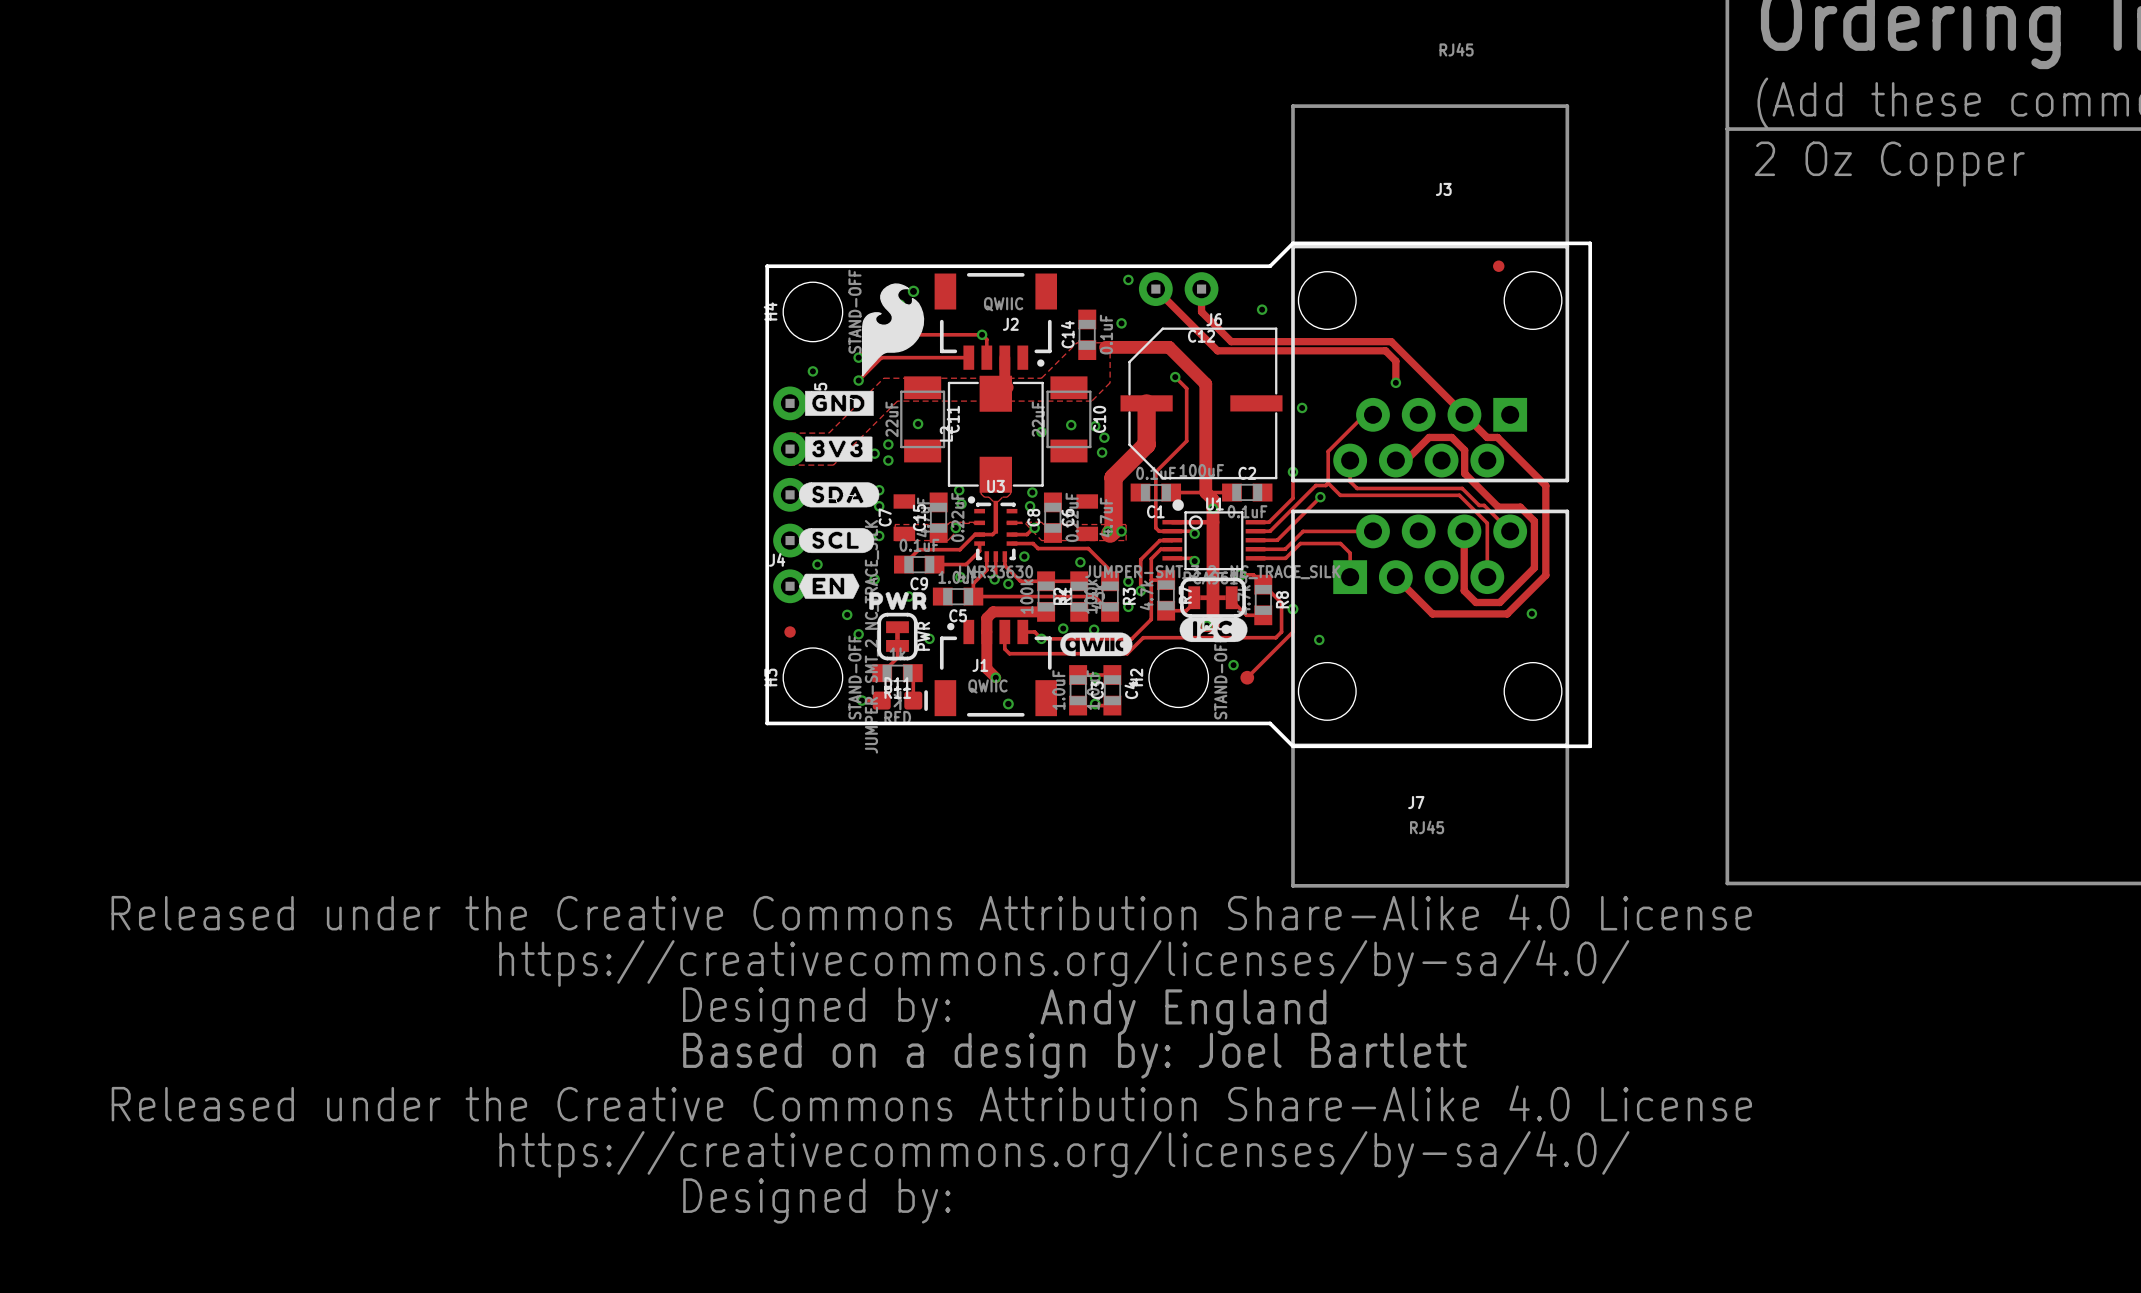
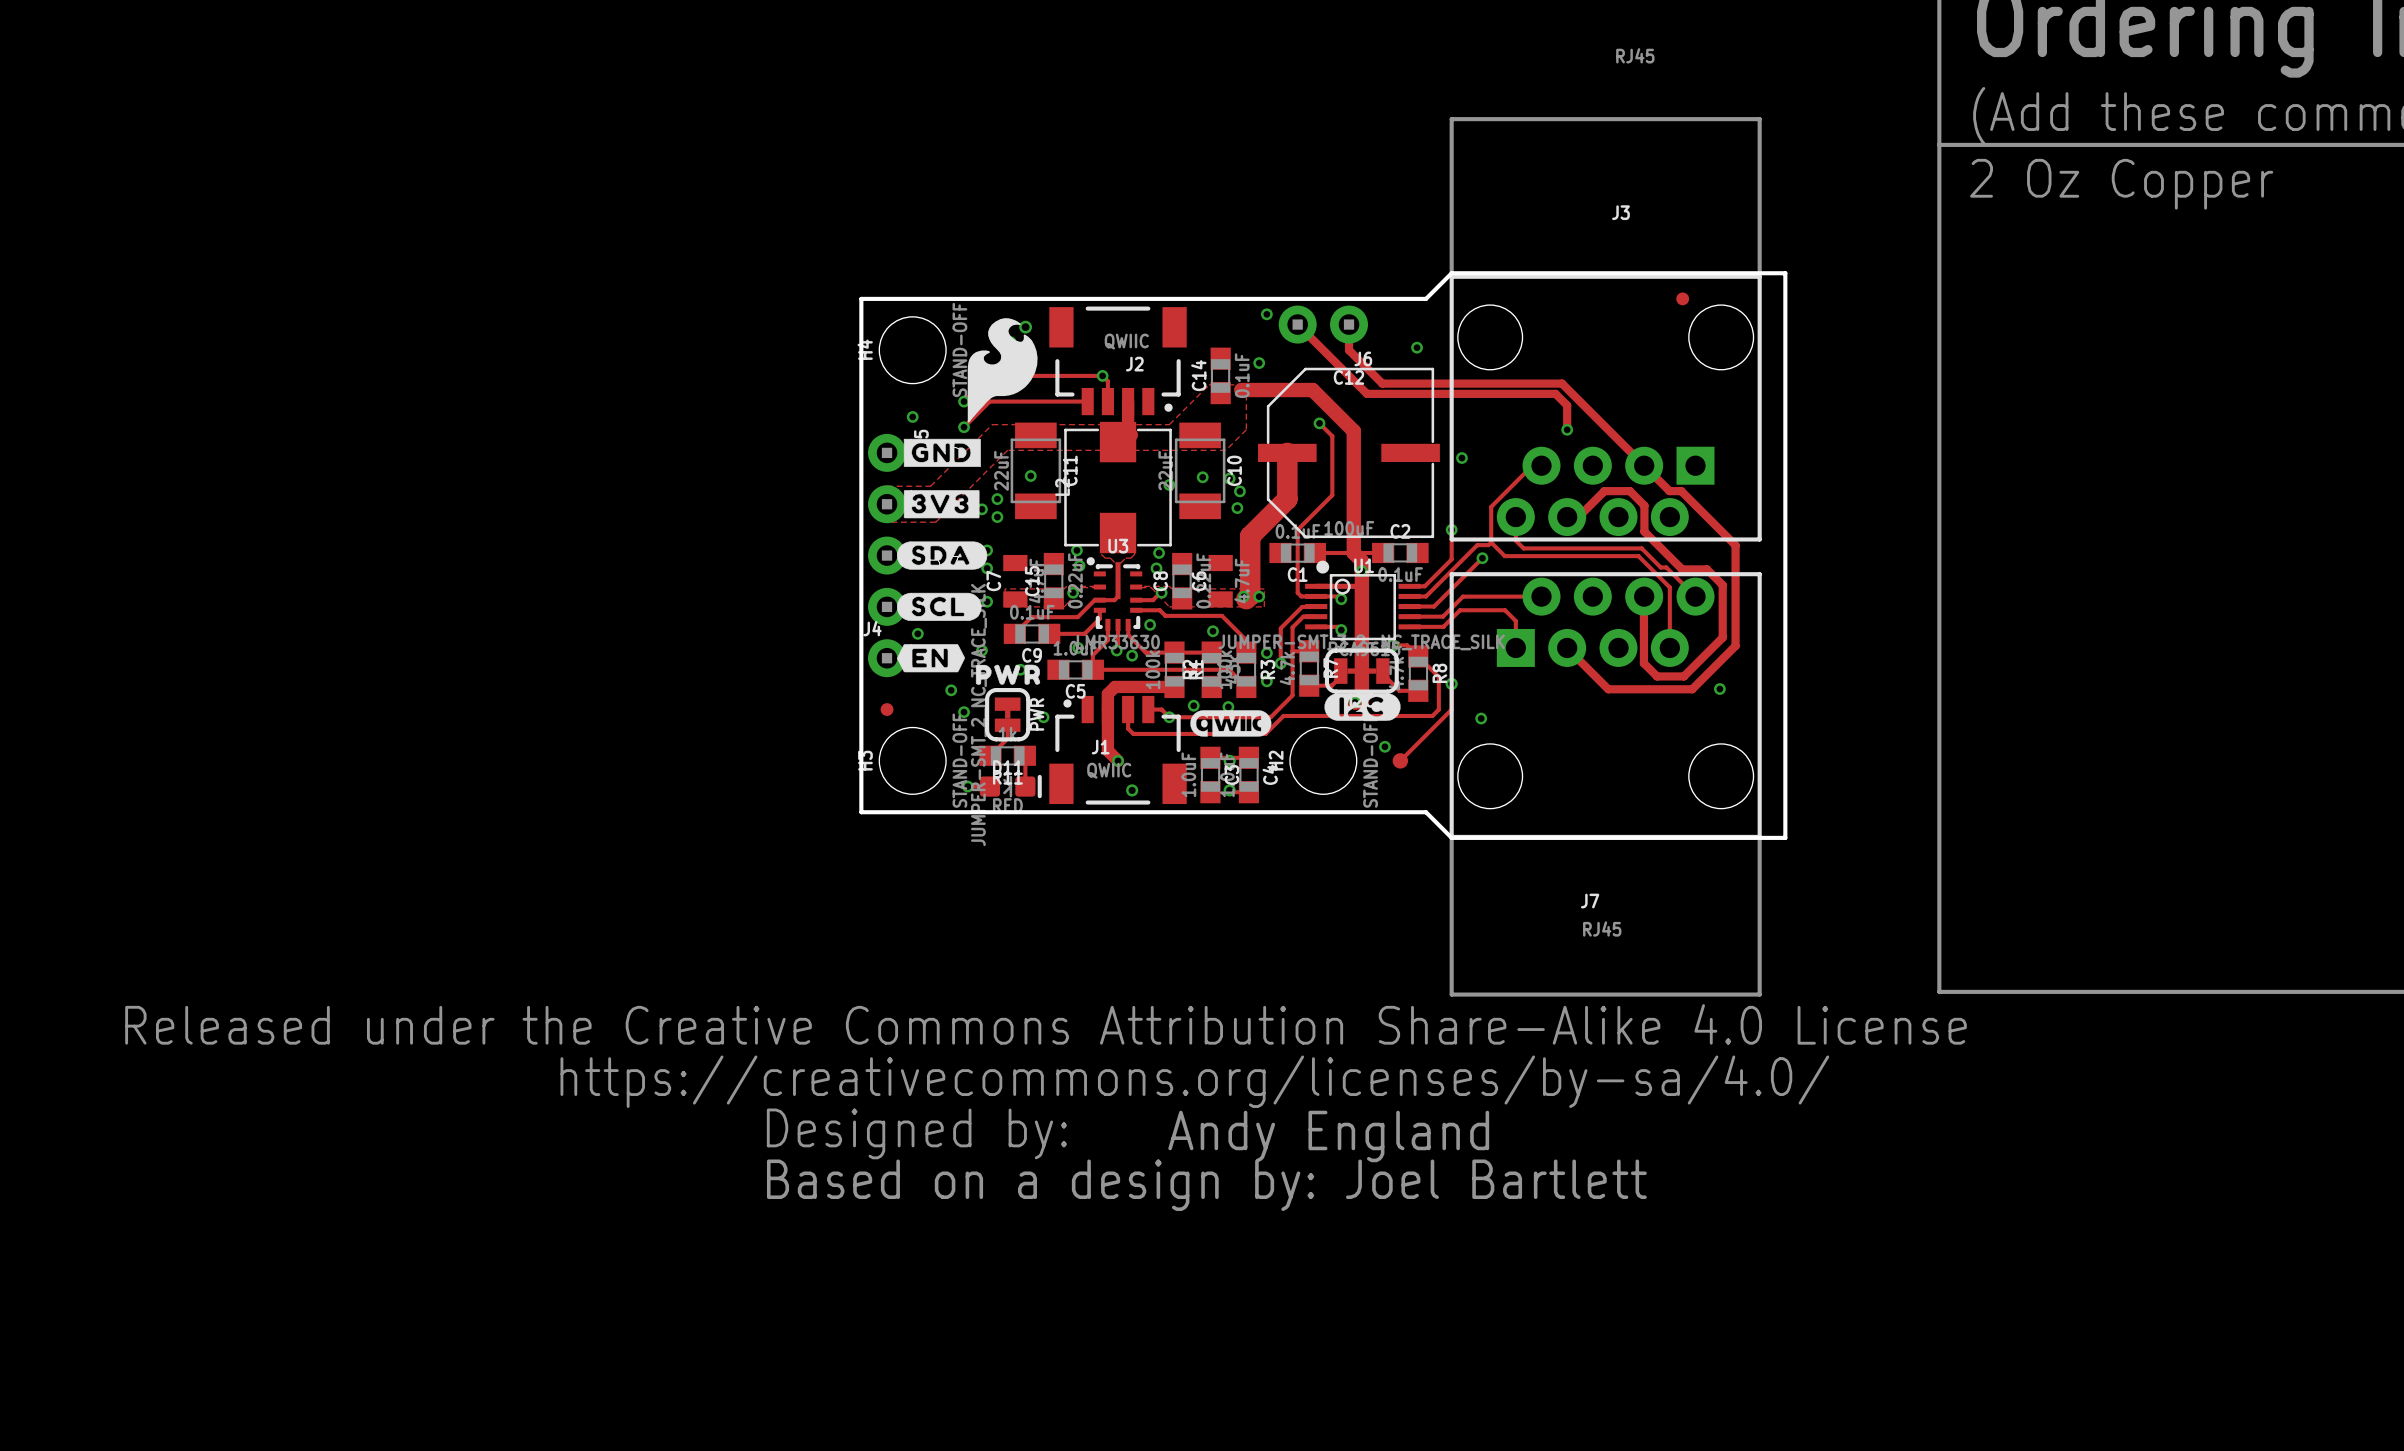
drawing: [111, 1085, 1752, 1224] -> none

